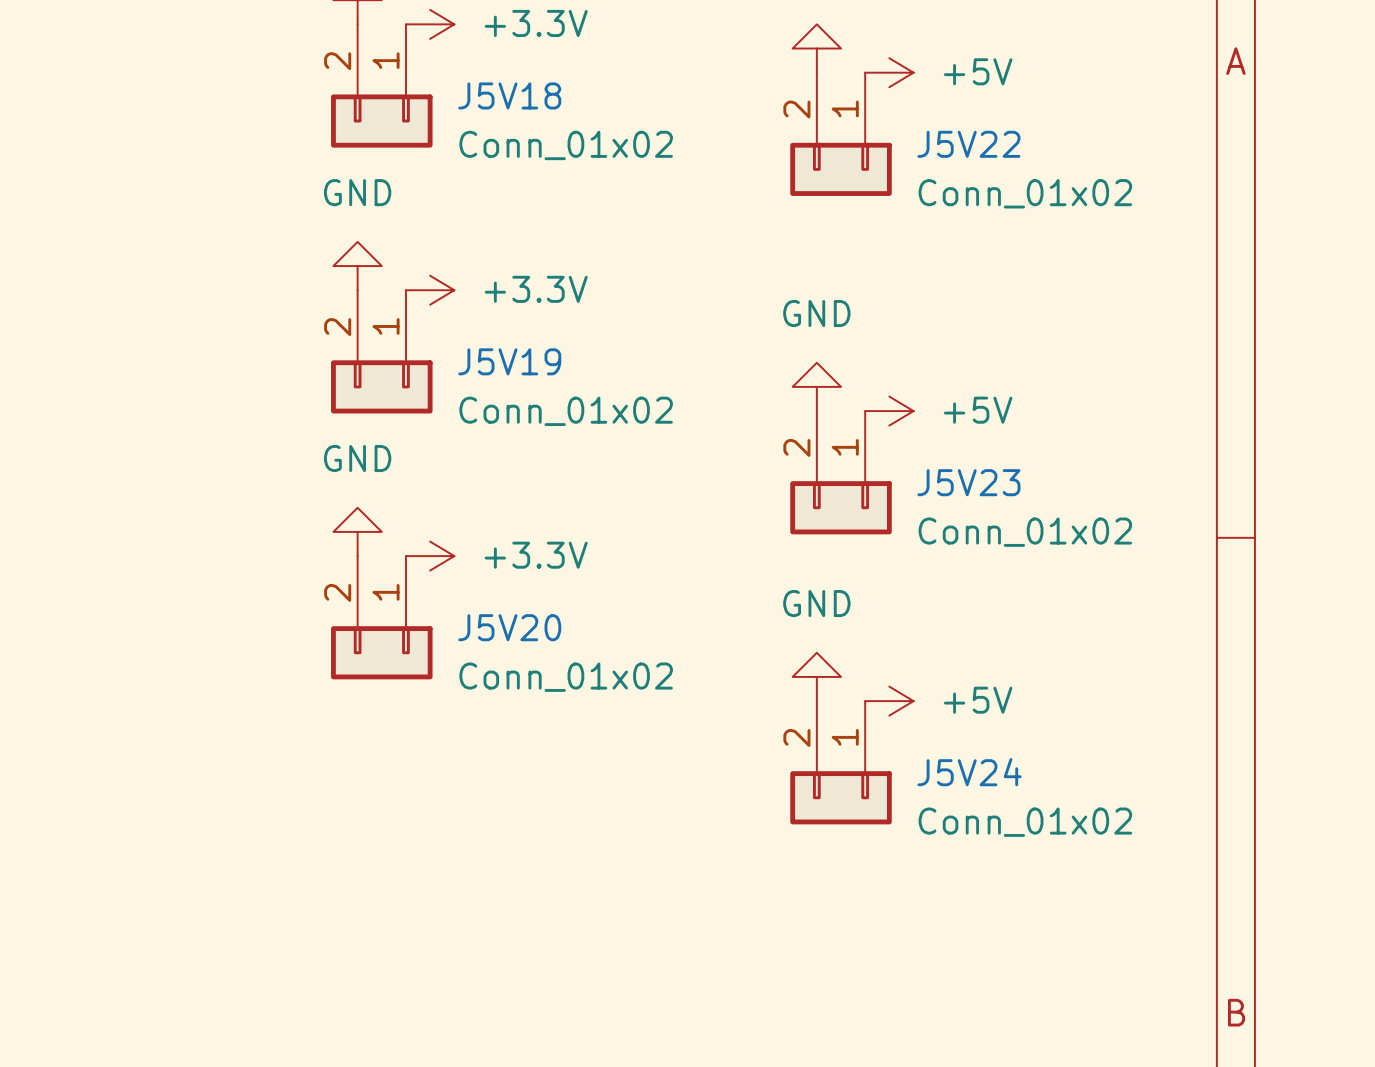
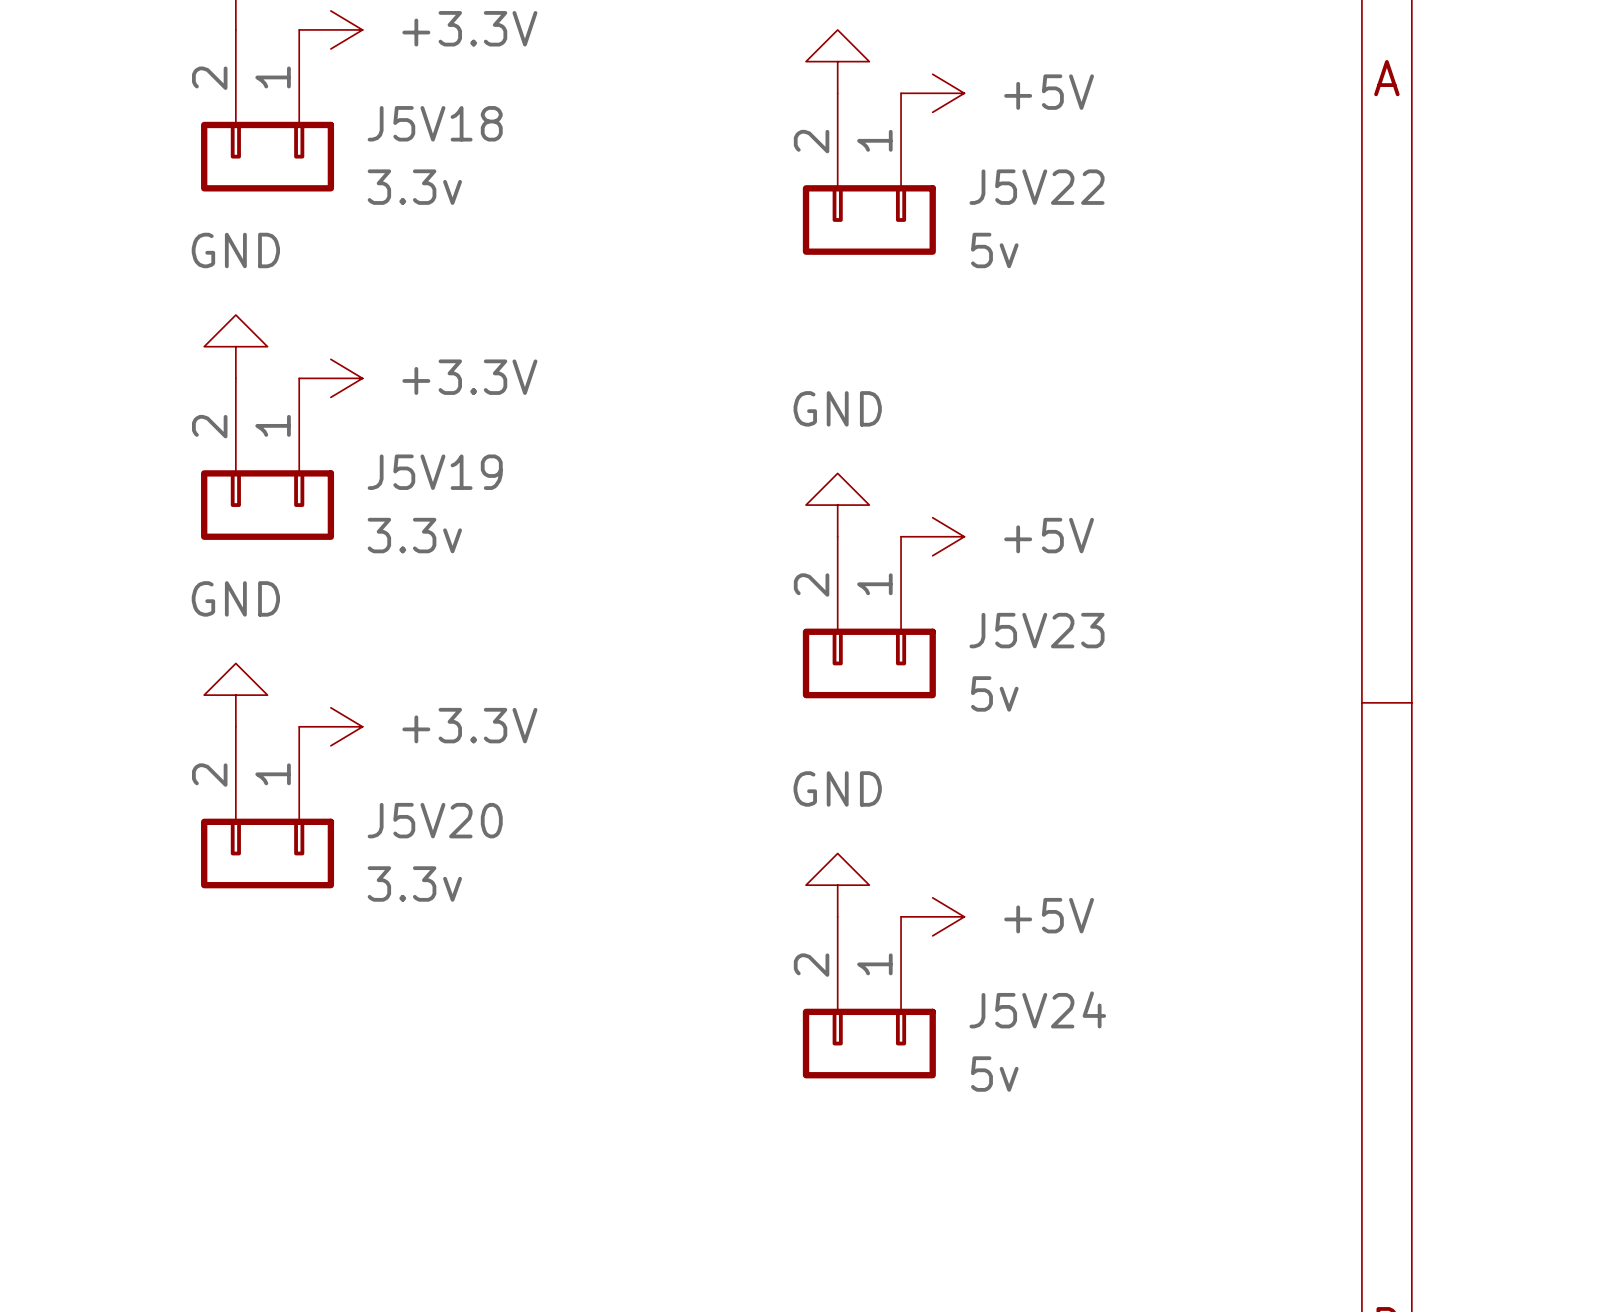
J5V18 value: Conn_01x02 (566, 145) -> 3.3v (414, 187)
J5V22 value: Conn_01x02 (1025, 193) -> 5v (994, 250)
J5V19 value: Conn_01x02 (566, 411) -> 3.3v (414, 535)
J5V23 value: Conn_01x02 (1025, 532) -> 5v (994, 693)
J5V20 value: Conn_01x02 (566, 677) -> 3.3v (414, 883)
J5V24 value: Conn_01x02 (1025, 822) -> 5v (994, 1074)

